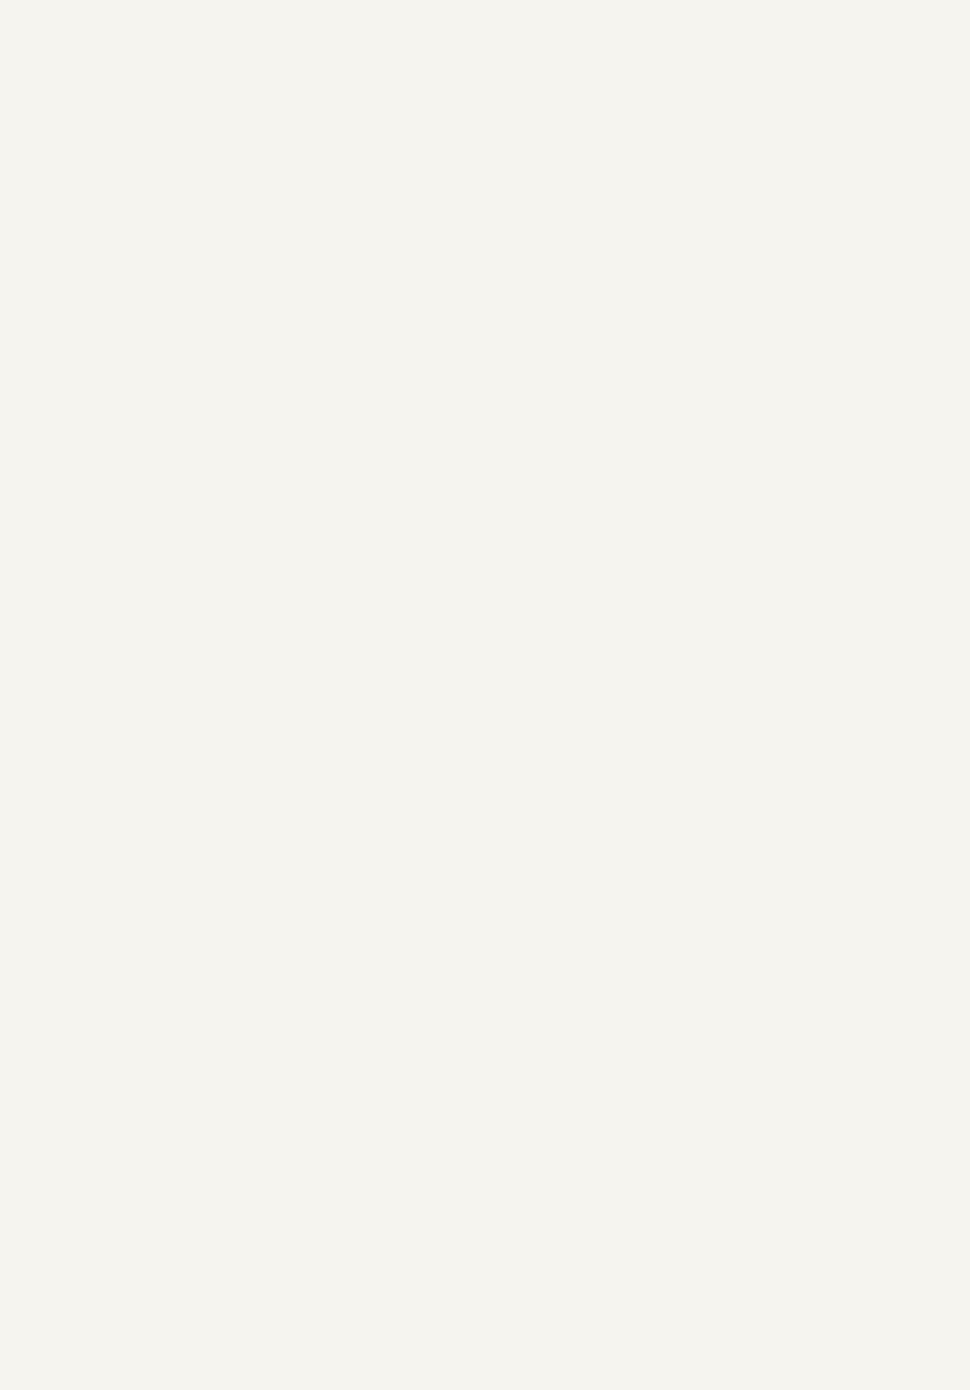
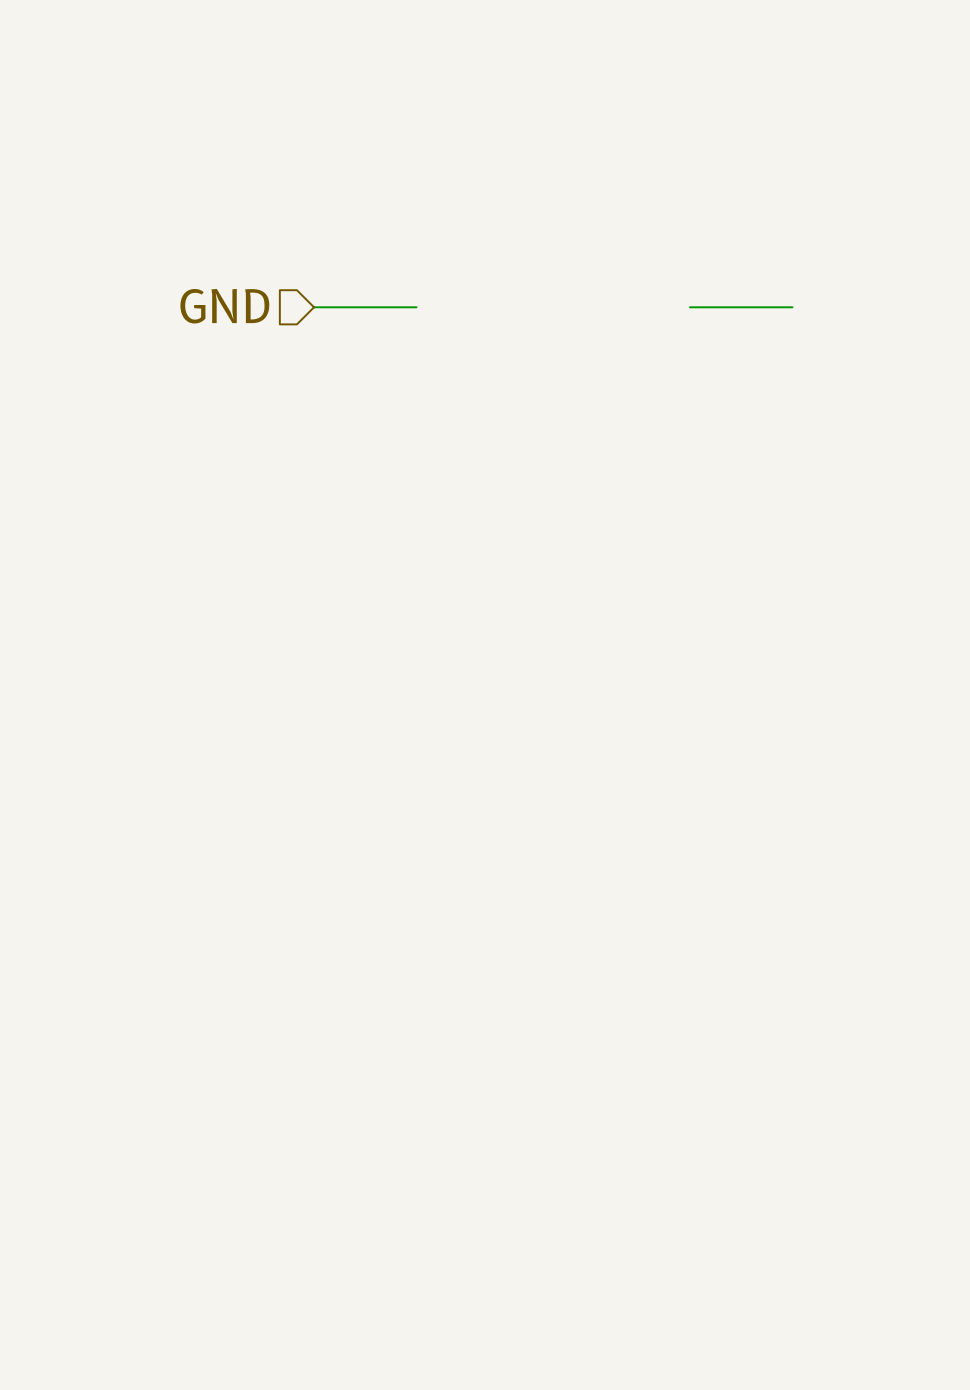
hierarchical label: none -> GND (224, 306)
wire: none -> (314, 307) (416, 307)
wire: none -> (689, 307) (792, 307)

